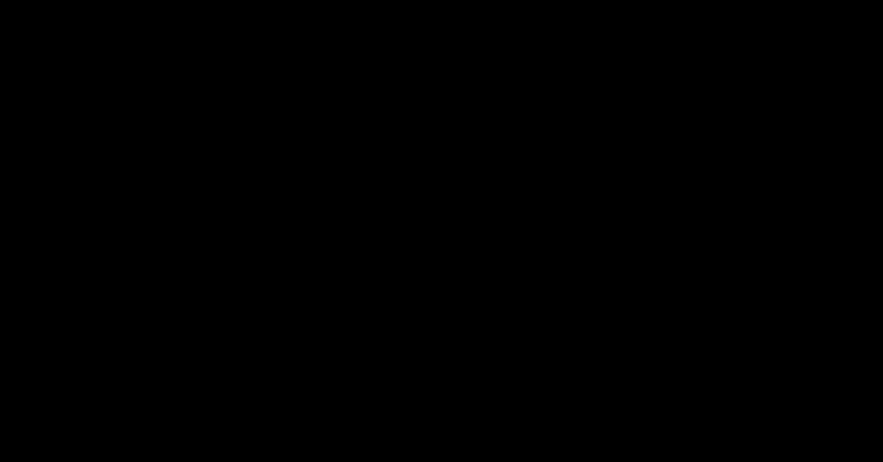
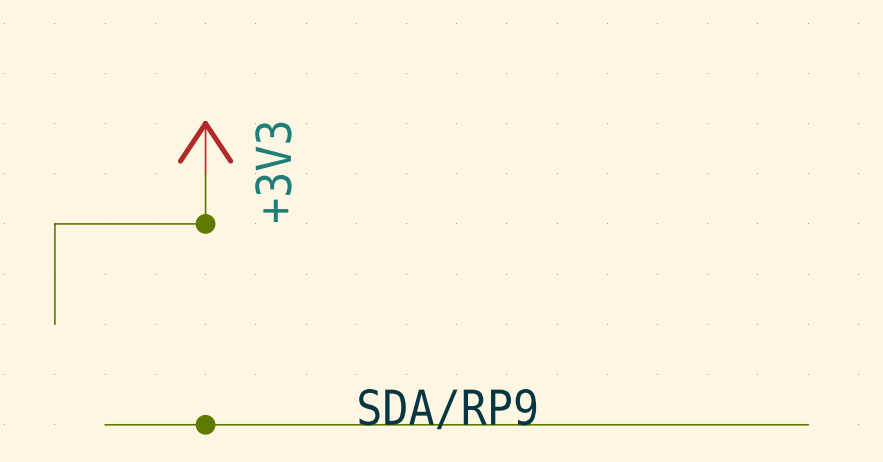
power symbol: none -> +3V3 (205, 147)
wire: none -> (205, 173) (205, 223) (54, 223) (54, 324)
junction: none -> (205, 223)
label: none -> SDA/RP9 (447, 409)
wire: none -> (105, 424) (808, 424)
junction: none -> (205, 424)

